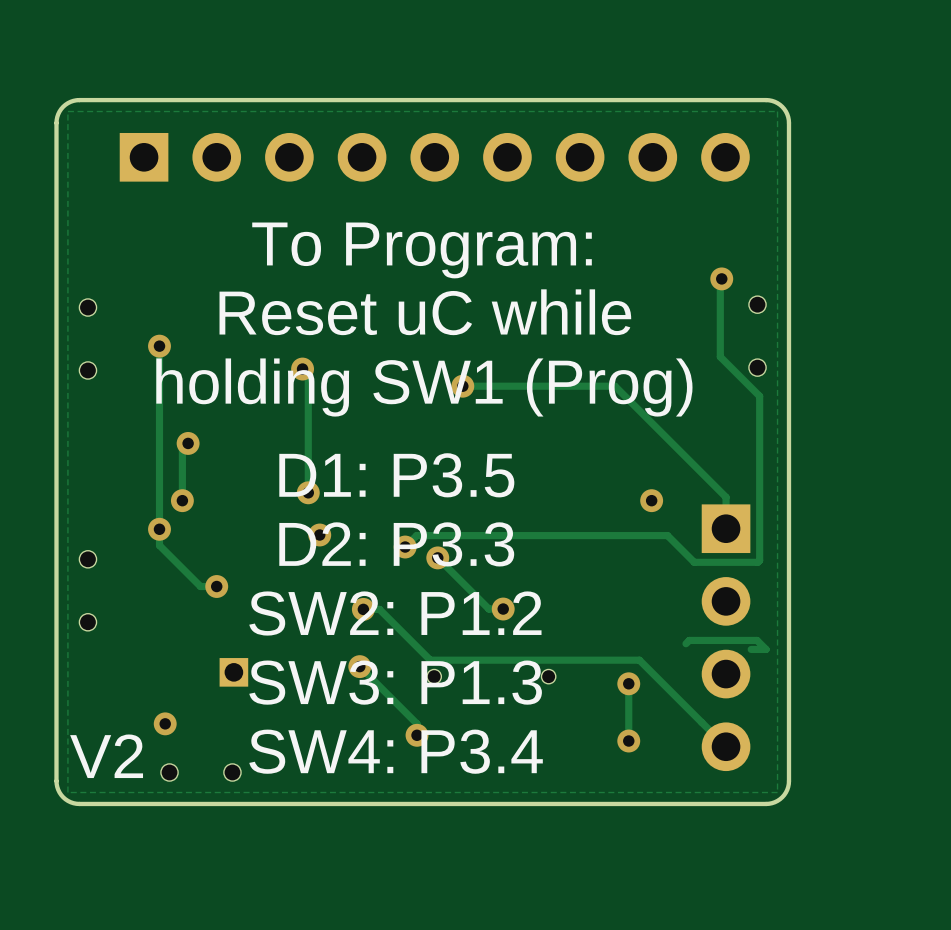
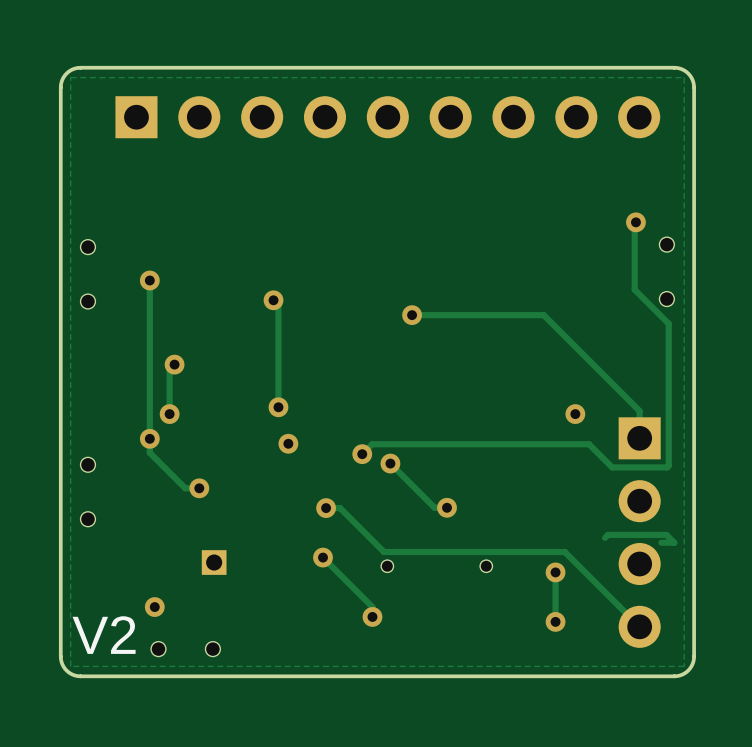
text: To Program: (422, 250) -> none
text: Reset uC while (425, 312) -> none
text: holding SW1 (Prog) (424, 387) -> none
text: D1: P3.5 (396, 475) -> none
text: D2: P3.3 (396, 544) -> none
text: SW2: P1.2 (395, 613) -> none
text: SW3: P1.3 (395, 682) -> none
text: SW4: P3.4 (396, 751) -> none

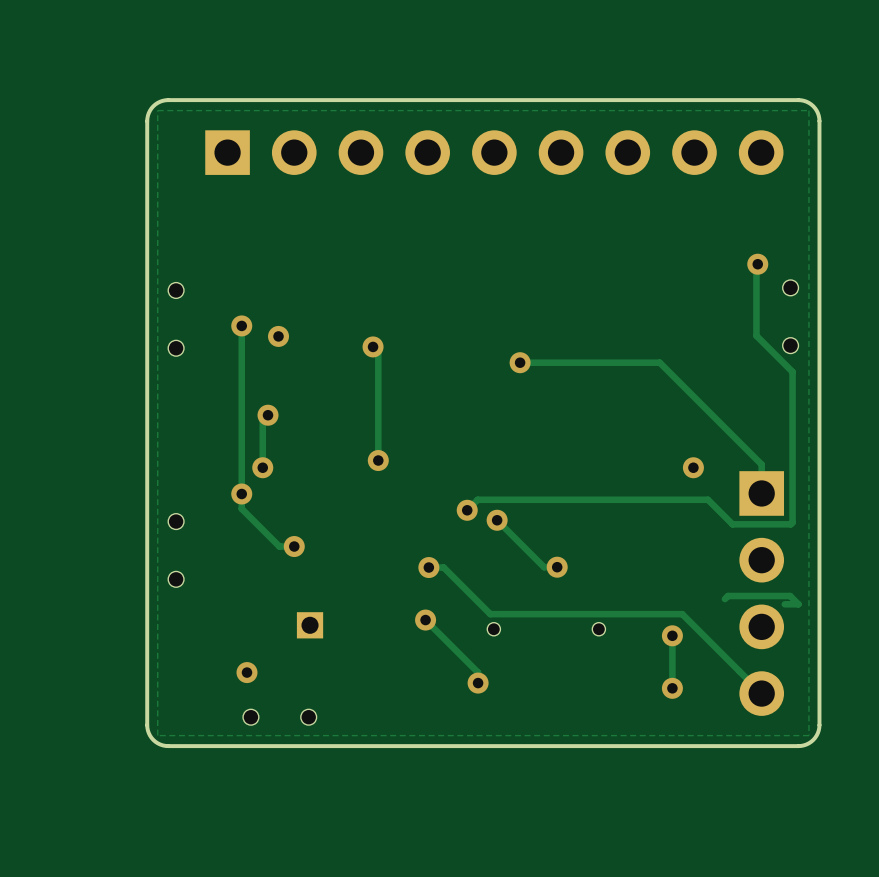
via: none -> (278, 336)
via: (288, 443) -> none
text: V2 (104, 635) -> none

